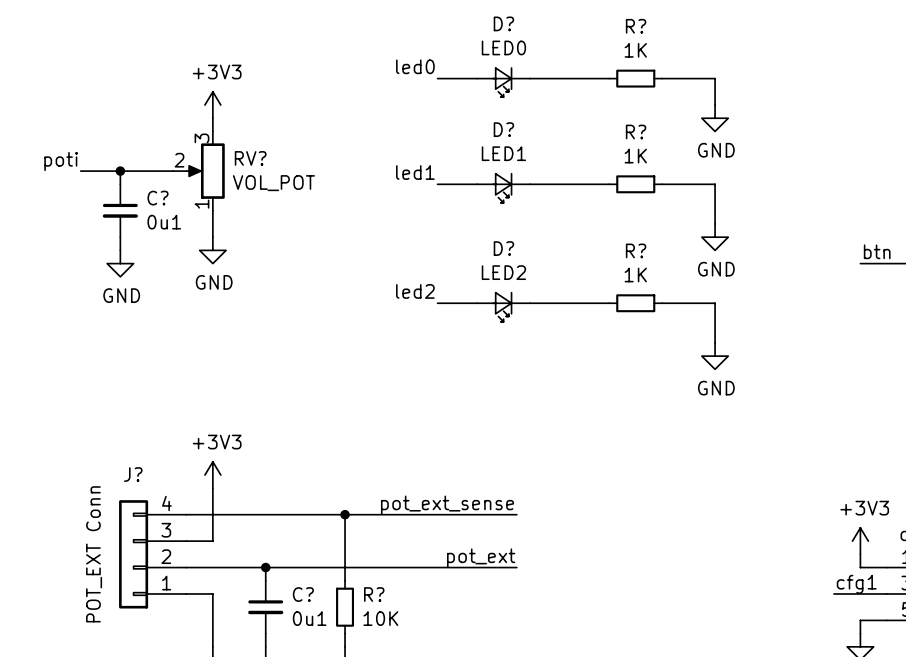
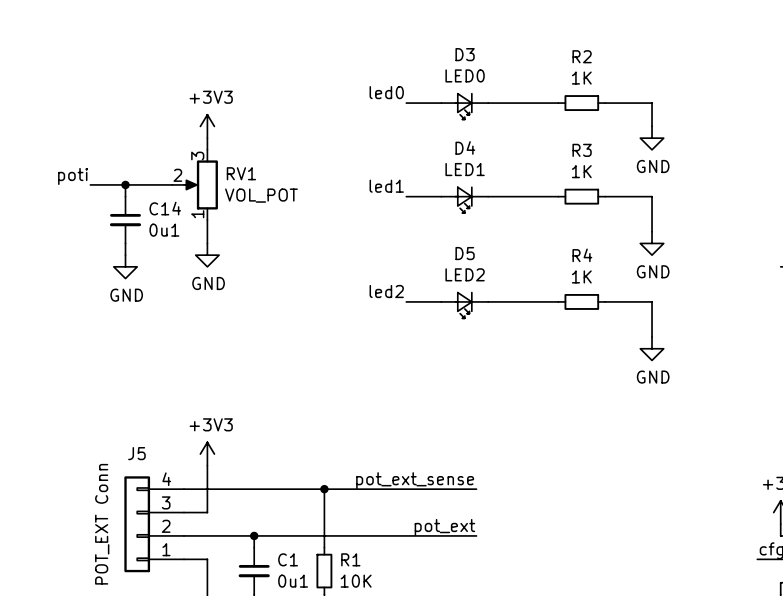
D? name: D? (503, 23) -> D3 (465, 54)
R? name: R? (636, 26) -> R2 (582, 56)
D? name: D? (503, 129) -> D4 (465, 147)
R? name: R? (636, 132) -> R3 (582, 150)
RV? name: RV? (250, 158) -> RV1 (241, 173)
C? name: C? (158, 198) -> C14 (165, 208)
D? name: D? (503, 248) -> D5 (465, 253)
R? name: R? (636, 250) -> R4 (582, 255)
J? name: J? (133, 474) -> J5 (136, 453)
C? name: C? (303, 594) -> C1 (288, 559)
R? name: R? (374, 594) -> R1 (350, 559)

